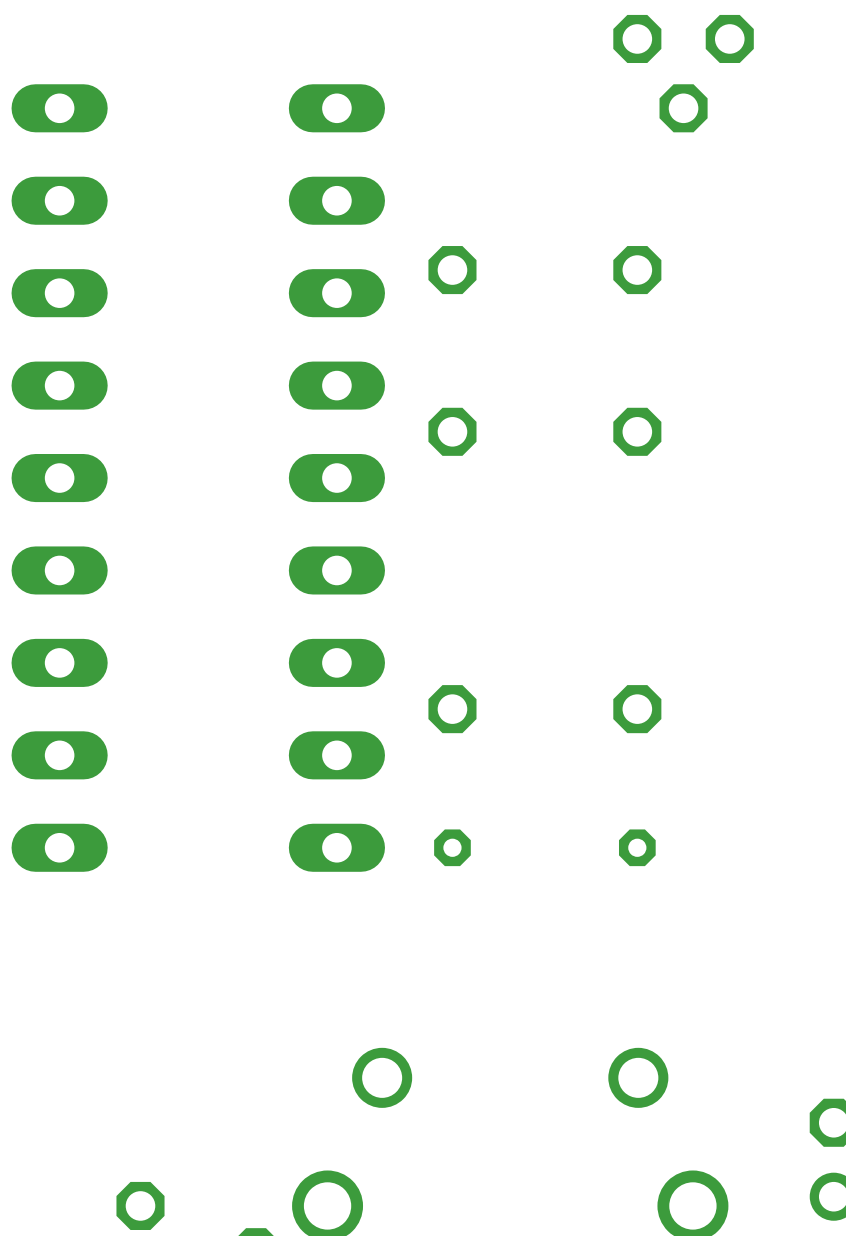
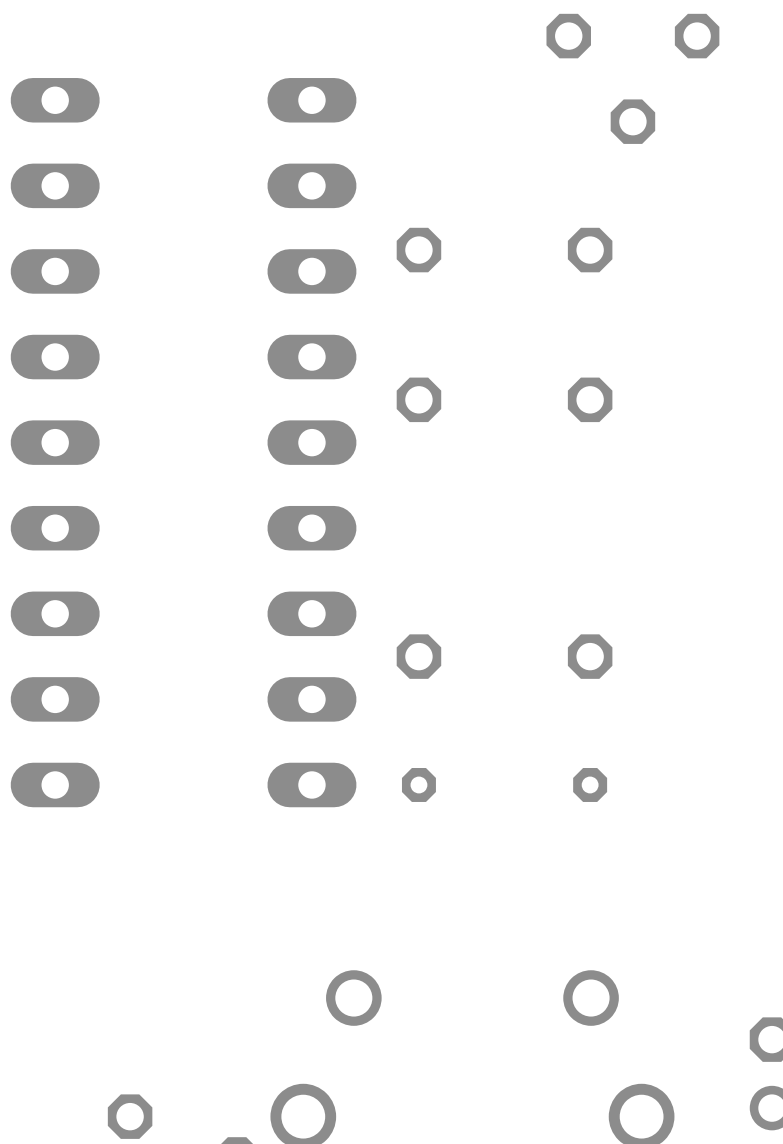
part footprint: [613, 14, 754, 133] -> [546, 13, 720, 144]

